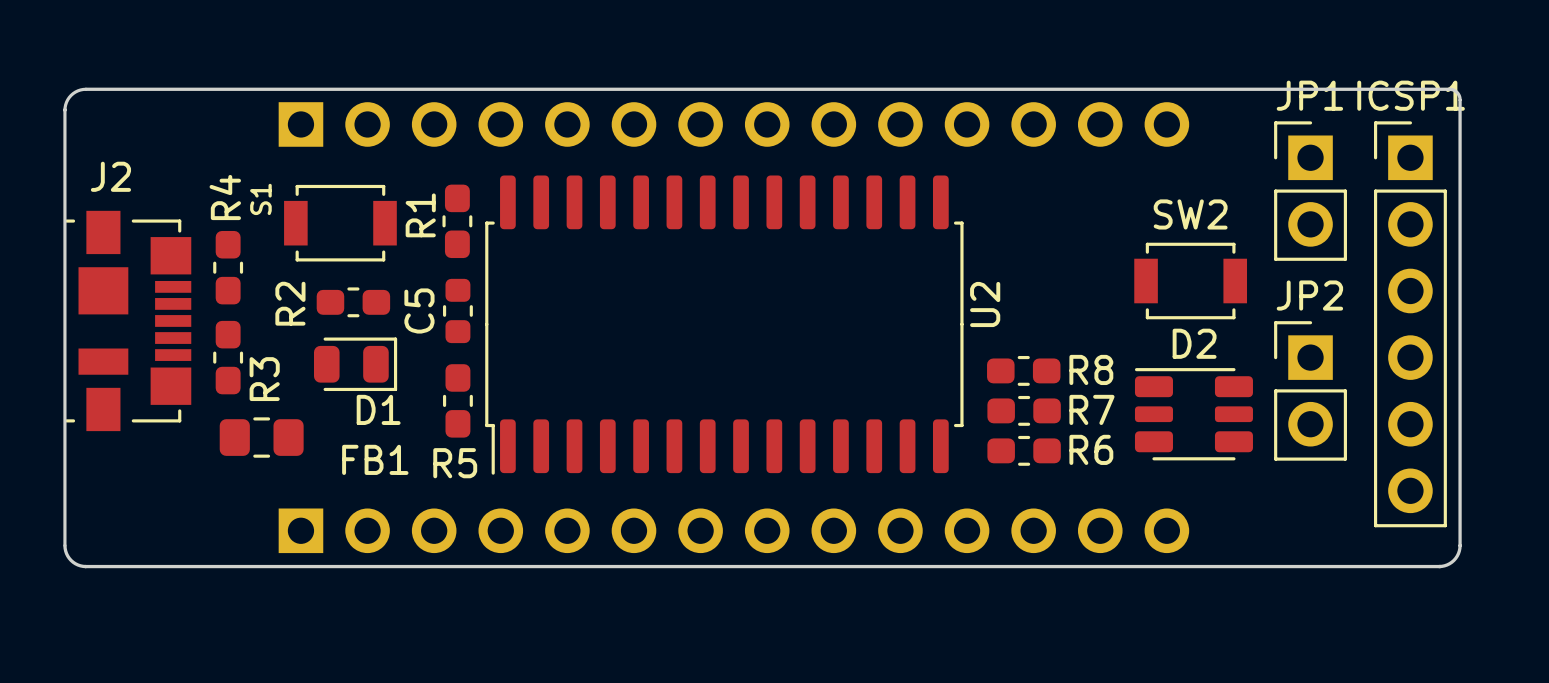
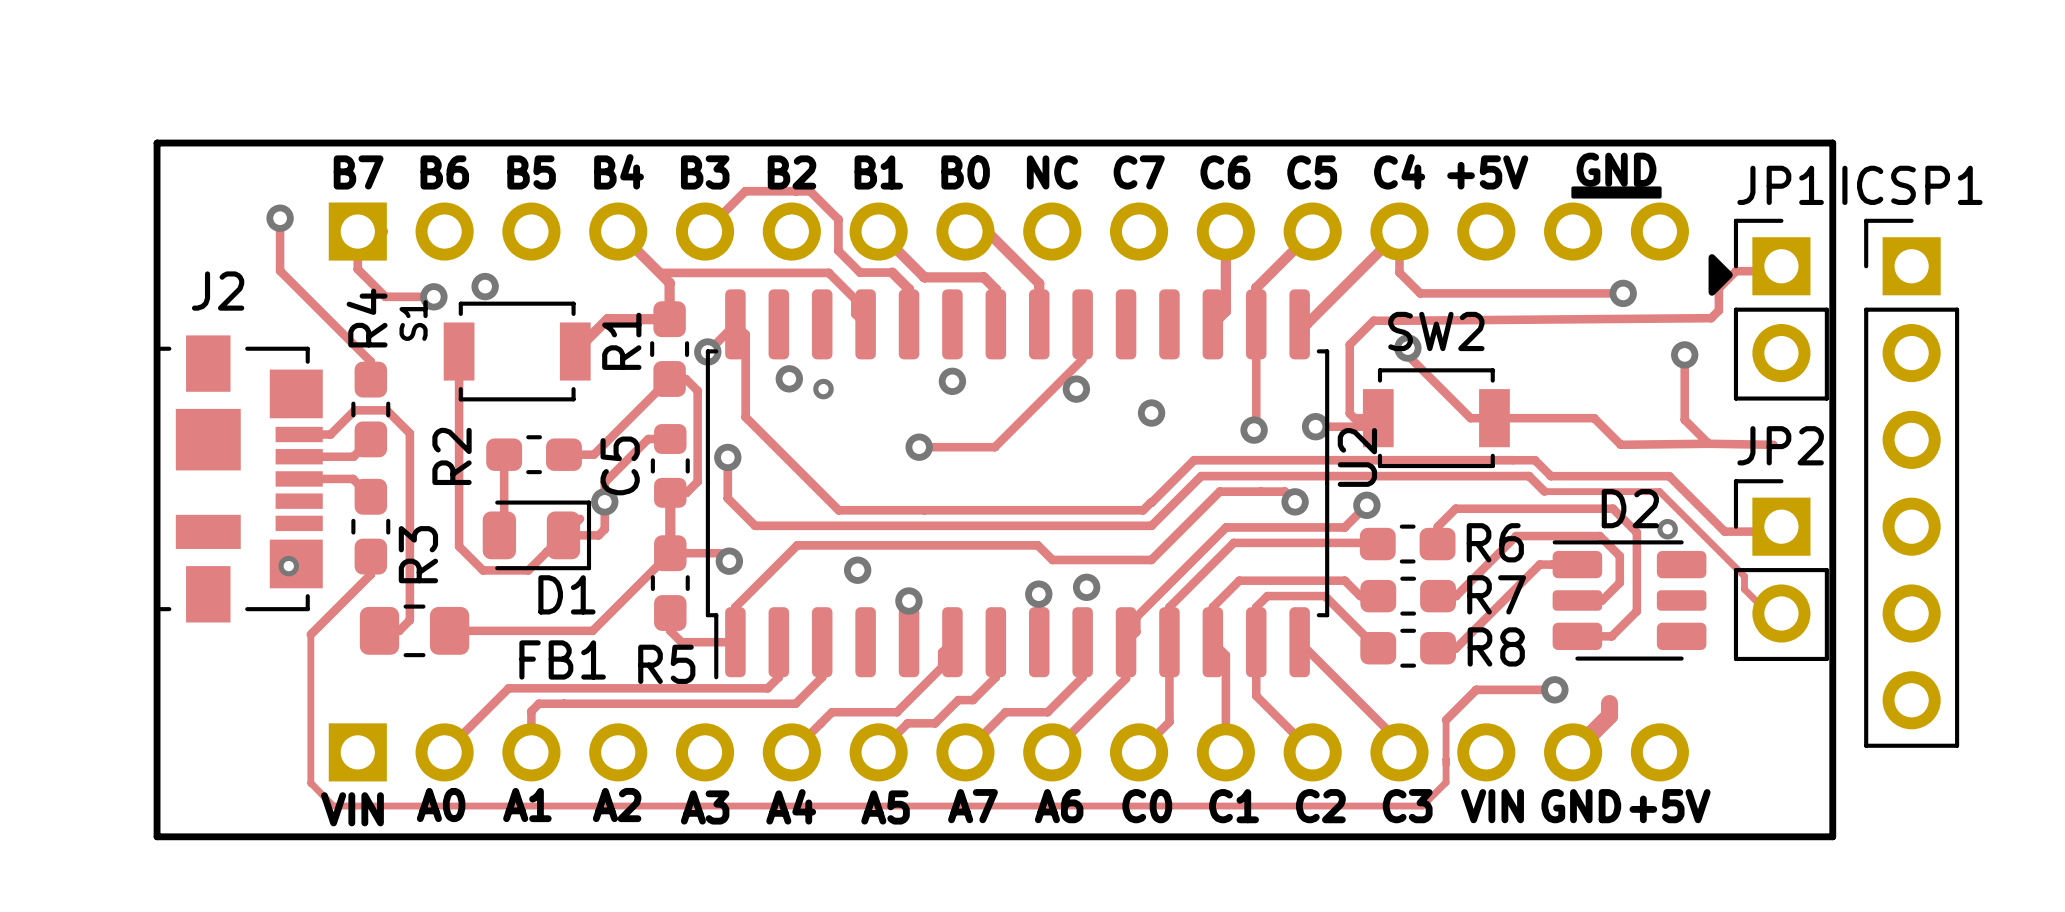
board edge: none -> (157, 143) (1832, 143) (1832, 836) (157, 836) (157, 143)
text: none -> GND (1616, 169)
text: none -> B7 (358, 172)
text: none -> B6 (444, 172)
text: none -> B5 (531, 172)
text: none -> B4 (619, 171)
text: none -> B3 (705, 172)
text: none -> B2 (792, 172)
text: none -> B1 (878, 172)
text: none -> B0 (965, 172)
text: none -> NC (1052, 172)
text: none -> C7 (1139, 172)
text: none -> C6 (1225, 172)
text: none -> C5 (1312, 172)
text: none -> C4 (1399, 171)
text: none -> +5V (1487, 172)
drawing: none -> [1571, 186, 1662, 199]
board edge: (1460, 99) (1456, 92) (1449, 89) (85, 89) (77, 90) (71, 95) (66, 102) (64, 110) -> none
board edge: (1460, 100) (1460, 545) (1458, 553) (1453, 560) (1447, 564) (1439, 566) -> none
part footprint: [278, 102, 1190, 147] -> [328, 202, 1689, 261]
board edge: (64, 109) (64, 545) (66, 553) (71, 560) (77, 564) (85, 566) -> none
track: none -> (280, 218) (280, 270) (370, 361) (370, 379)
via: none -> (280, 218)
track: none -> (382, 231) (357, 231) (357, 269) (385, 296) (433, 296)
track: none -> (705, 231) (745, 191) (810, 191) (838, 219) (838, 250) (860, 272) (892, 272) (909, 289) (909, 324)
track: none -> (878, 231) (924, 277) (983, 277) (995, 289) (995, 324)
track: none -> (965, 231) (987, 231) (1039, 283) (1039, 324)
track: none -> (1225, 231) (1225, 311) (1212, 324)
track: none -> (1312, 231) (1256, 287) (1256, 324)
drawing: none -> [1708, 254, 1733, 296]
track: none -> (1773, 271) (1735, 271) (1718, 288) (1718, 310) (1711, 318) (1373, 320) (1349, 344) (1349, 413) (1354, 418) (1378, 418) (1369, 426) (1315, 426)
via: none -> (485, 286)
track: none -> (1623, 293) (1420, 293) (1399, 272) (1399, 231) (1306, 324) (1299, 324)
via: none -> (1623, 293)
via: none -> (433, 296)
track: none -> (865, 324) (855, 314) (855, 299) (828, 272) (659, 272) (618, 231) (669, 282) (669, 319) (607, 319) (575, 351)
track: none -> (1256, 324) (1256, 427) (1254, 430)
track: none -> (1407, 348) (1407, 355) (1470, 418) (1594, 418) (1620, 444) (1708, 443)
via: none -> (1407, 348)
track: none -> (459, 351) (459, 546) (482, 570) (528, 570) (580, 518)
via: none -> (707, 352)
track: none -> (704, 354) (735, 324) (745, 334) (745, 417) (838, 510) (1143, 510) (1194, 460) (1535, 460) (1550, 476) (1669, 476) (1724, 531) (1773, 531)
track: none -> (1684, 354) (1684, 419) (1708, 443)
via: none -> (1684, 354)
track: none -> (1082, 359) (994, 447) (919, 447)
via: none -> (789, 378)
via: none -> (952, 381)
via: none -> (823, 389)
via: none -> (1076, 389)
via: none -> (1151, 413)
via: none -> (1315, 426)
SW2 position: (1190, 281) -> (1436, 418)
via: none -> (1254, 430)
track: none -> (299, 434) (330, 434) (354, 410) (386, 410) (409, 433) (409, 620) (399, 630) (379, 630)
track: none -> (370, 439) (353, 456) (299, 456)
track: none -> (670, 439) (648, 439) (604, 482) (604, 529) (598, 535) (563, 535)
track: none -> (1708, 443) (1773, 444)
via: none -> (919, 447)
track: none -> (504, 454) (504, 530) (499, 535)
track: none -> (563, 454) (593, 454) (669, 378) (685, 378) (697, 390) (697, 481) (686, 492) (670, 492) (670, 553)
track: none -> (727, 457) (727, 498) (755, 525) (1151, 525) (1201, 476) (1529, 476) (1544, 491) (1659, 491) (1744, 576) (1744, 589) (1773, 618)
via: none -> (727, 457)
track: none -> (299, 478) (352, 478) (370, 496)
track: none -> (1291, 498) (1284, 491) (1219, 491) (1151, 559) (1052, 559) (1037, 545) (797, 545) (735, 607) (735, 642) (681, 642) (670, 630) (670, 613)
via: none -> (604, 501)
via: none -> (1295, 501)
track: none -> (1366, 505) (1344, 527) (1226, 527) (1136, 617) (1136, 631) (1126, 642) (1126, 678) (1052, 752)
via: none -> (1366, 505)
via: none -> (1667, 529)
R8 name: R8 (1091, 369) -> R6 (1495, 542)
track: none -> (1377, 542) (1233, 542) (1169, 607) (1169, 722) (1139, 752)
track: none -> (1437, 542) (1437, 526) (1455, 508) (1612, 508) (1636, 532) (1636, 611) (1611, 636) (1577, 636)
track: none -> (670, 553) (592, 630) (449, 630)
track: none -> (670, 553) (721, 553) (729, 561)
track: none -> (370, 556) (370, 574) (310, 634) (310, 783)
via: none -> (729, 561)
track: none -> (1577, 564) (1539, 564) (1455, 648) (1437, 648)
via: none -> (288, 566)
via: none -> (857, 570)
via: none -> (1086, 587)
via: none -> (1038, 594)
track: none -> (1378, 596) (1360, 596) (1344, 580) (1239, 580) (1212, 607) (1212, 642) (1225, 655) (1225, 752)
track: none -> (1438, 596) (1456, 596) (1516, 536) (1599, 536) (1619, 556) (1619, 582) (1602, 600) (1577, 600)
via: none -> (908, 600)
track: none -> (1086, 638) (1082, 642) (1082, 677) (1047, 712) (1005, 712) (965, 752)
track: none -> (778, 642) (778, 677) (767, 688) (508, 688) (444, 752)
track: none -> (822, 642) (822, 677) (795, 703) (538, 703) (531, 711) (531, 752)
track: none -> (952, 642) (942, 652) (942, 667) (896, 712) (831, 712) (791, 752)
track: none -> (995, 642) (995, 677) (972, 700) (958, 700) (935, 723) (907, 723) (878, 752)
track: none -> (1299, 642) (1399, 742) (1399, 752)
R6 name: R6 (1091, 449) -> R8 (1496, 646)
track: none -> (1377, 648) (1325, 596) (1267, 596) (1256, 607) (1256, 695) (1312, 752)
track: none -> (1554, 689) (1476, 689) (1446, 720) (1446, 782) (1422, 806) (333, 806)
via: none -> (1554, 689)
track: none -> (1609, 703) (1609, 715) (1573, 752)
part footprint: [278, 508, 1190, 554] -> [328, 723, 1689, 782]
track: none -> (310, 782) (331, 804)
board edge: (85, 566) (1440, 566) -> none
text: none -> A0 (441, 805)
text: none -> A1 (527, 805)
text: none -> A2 (617, 805)
text: none -> A4 (791, 806)
text: none -> A7 (972, 806)
text: none -> A6 (1059, 806)
text: none -> C0 (1147, 806)
text: none -> C1 (1234, 806)
text: none -> C2 (1320, 806)
text: none -> C3 (1407, 806)
text: none -> VIN (1492, 806)
text: none -> GND (1581, 806)
text: none -> +5V (1670, 806)
text: none -> A3 (705, 807)
text: none -> A5 (885, 807)
text: none -> VIN (352, 809)

